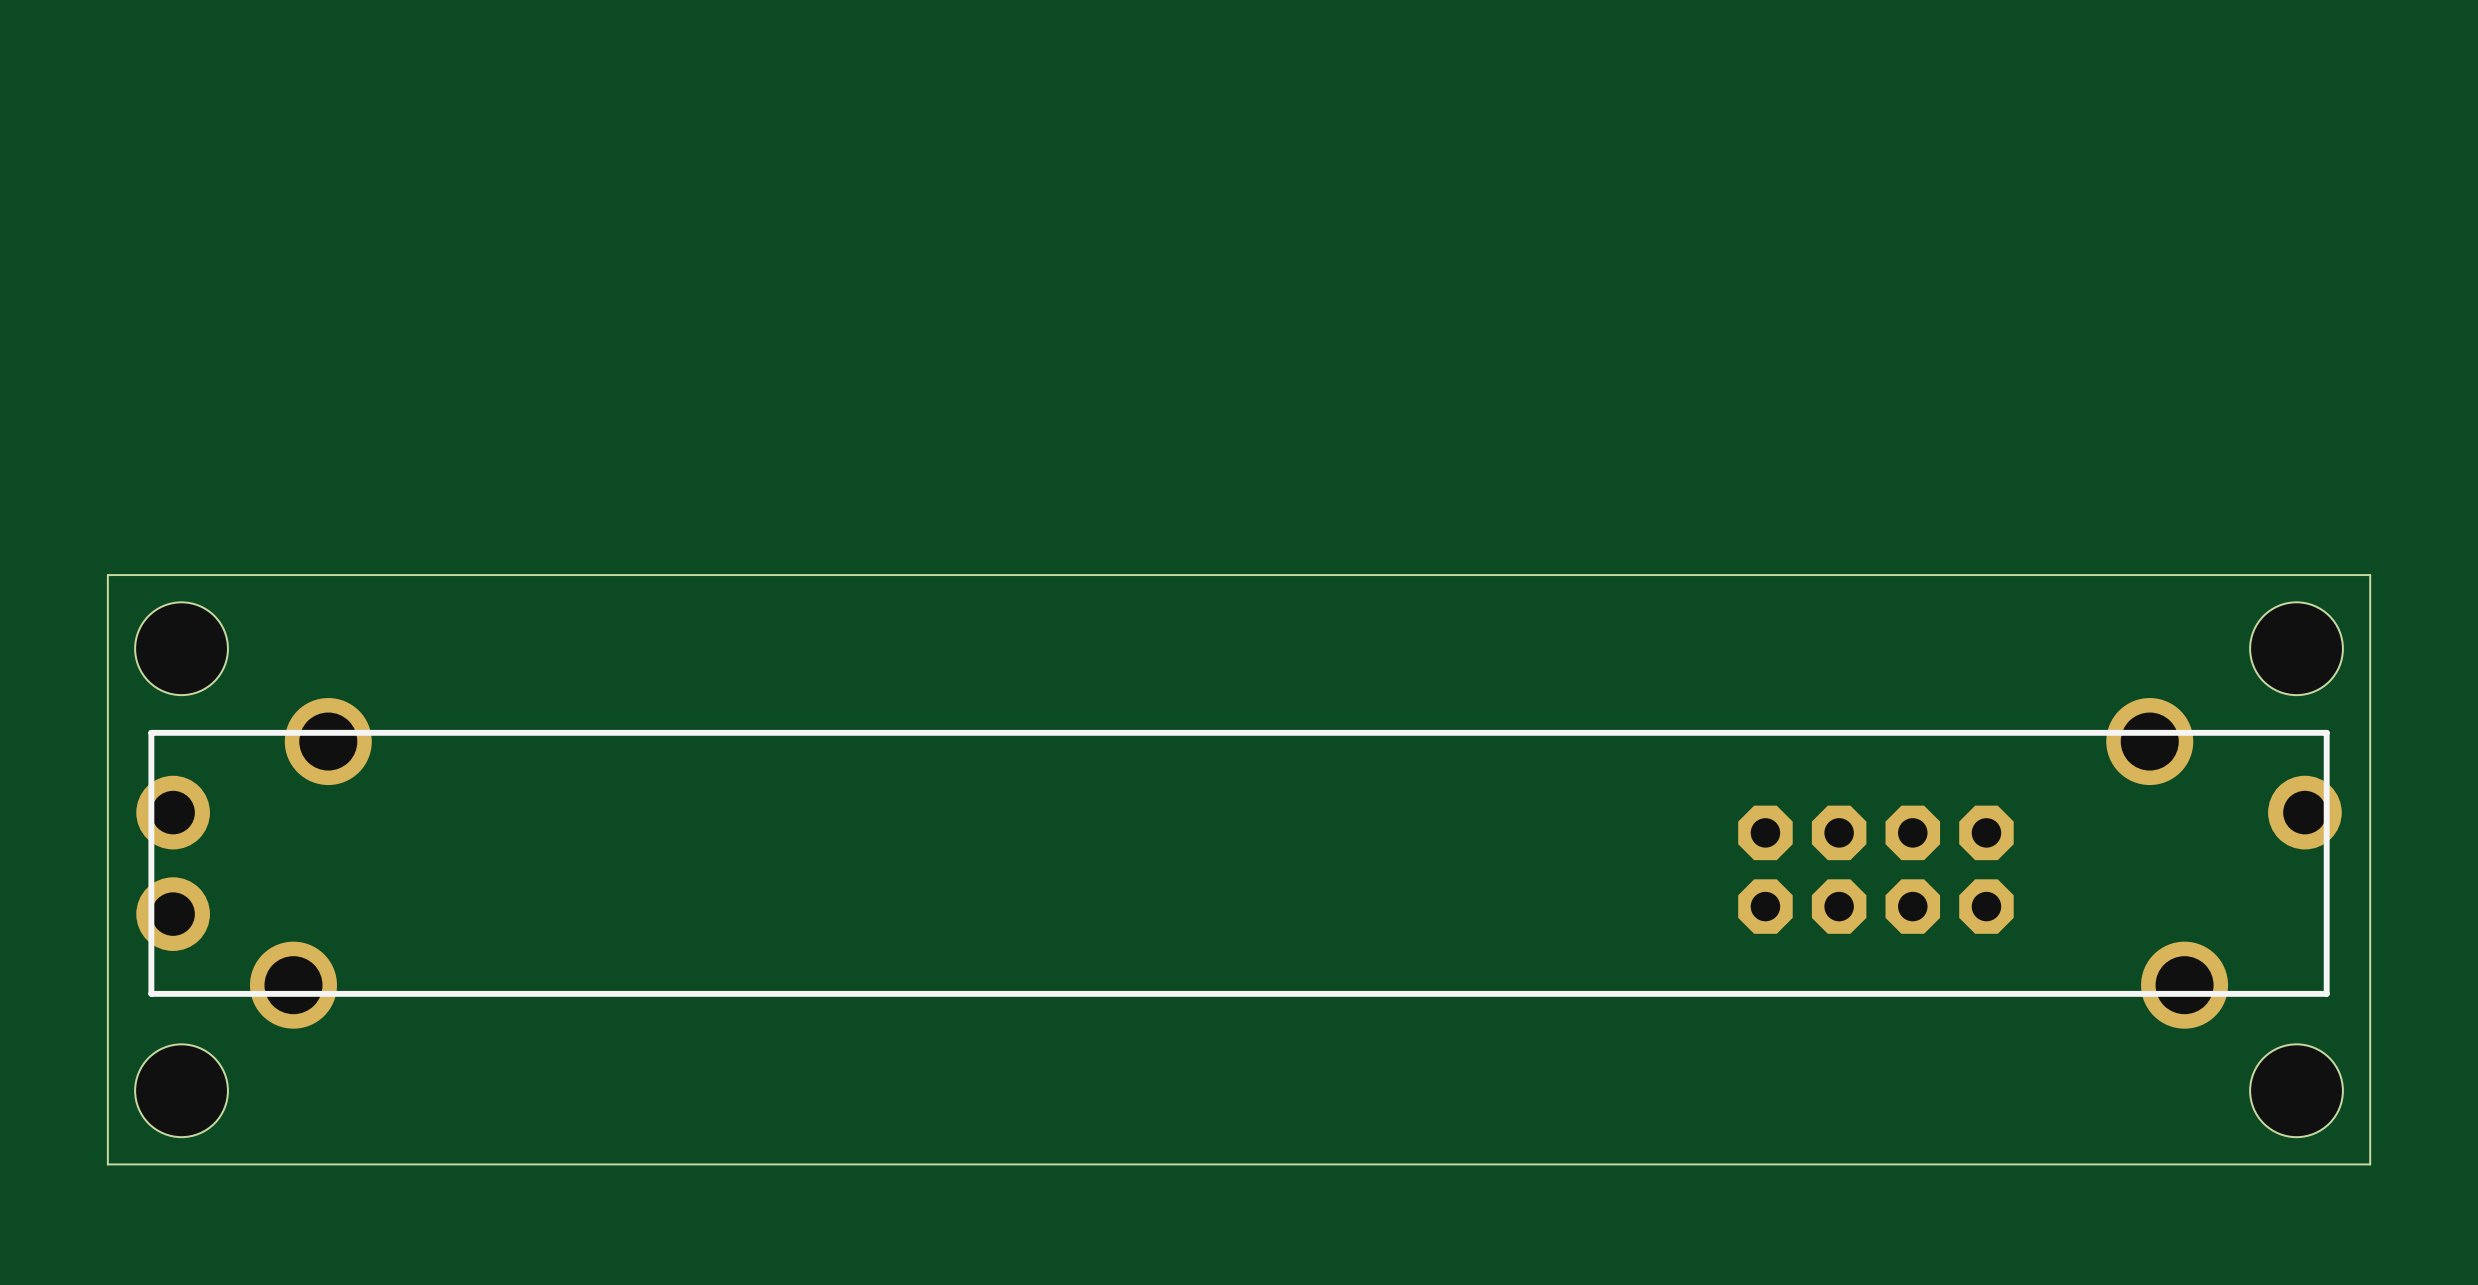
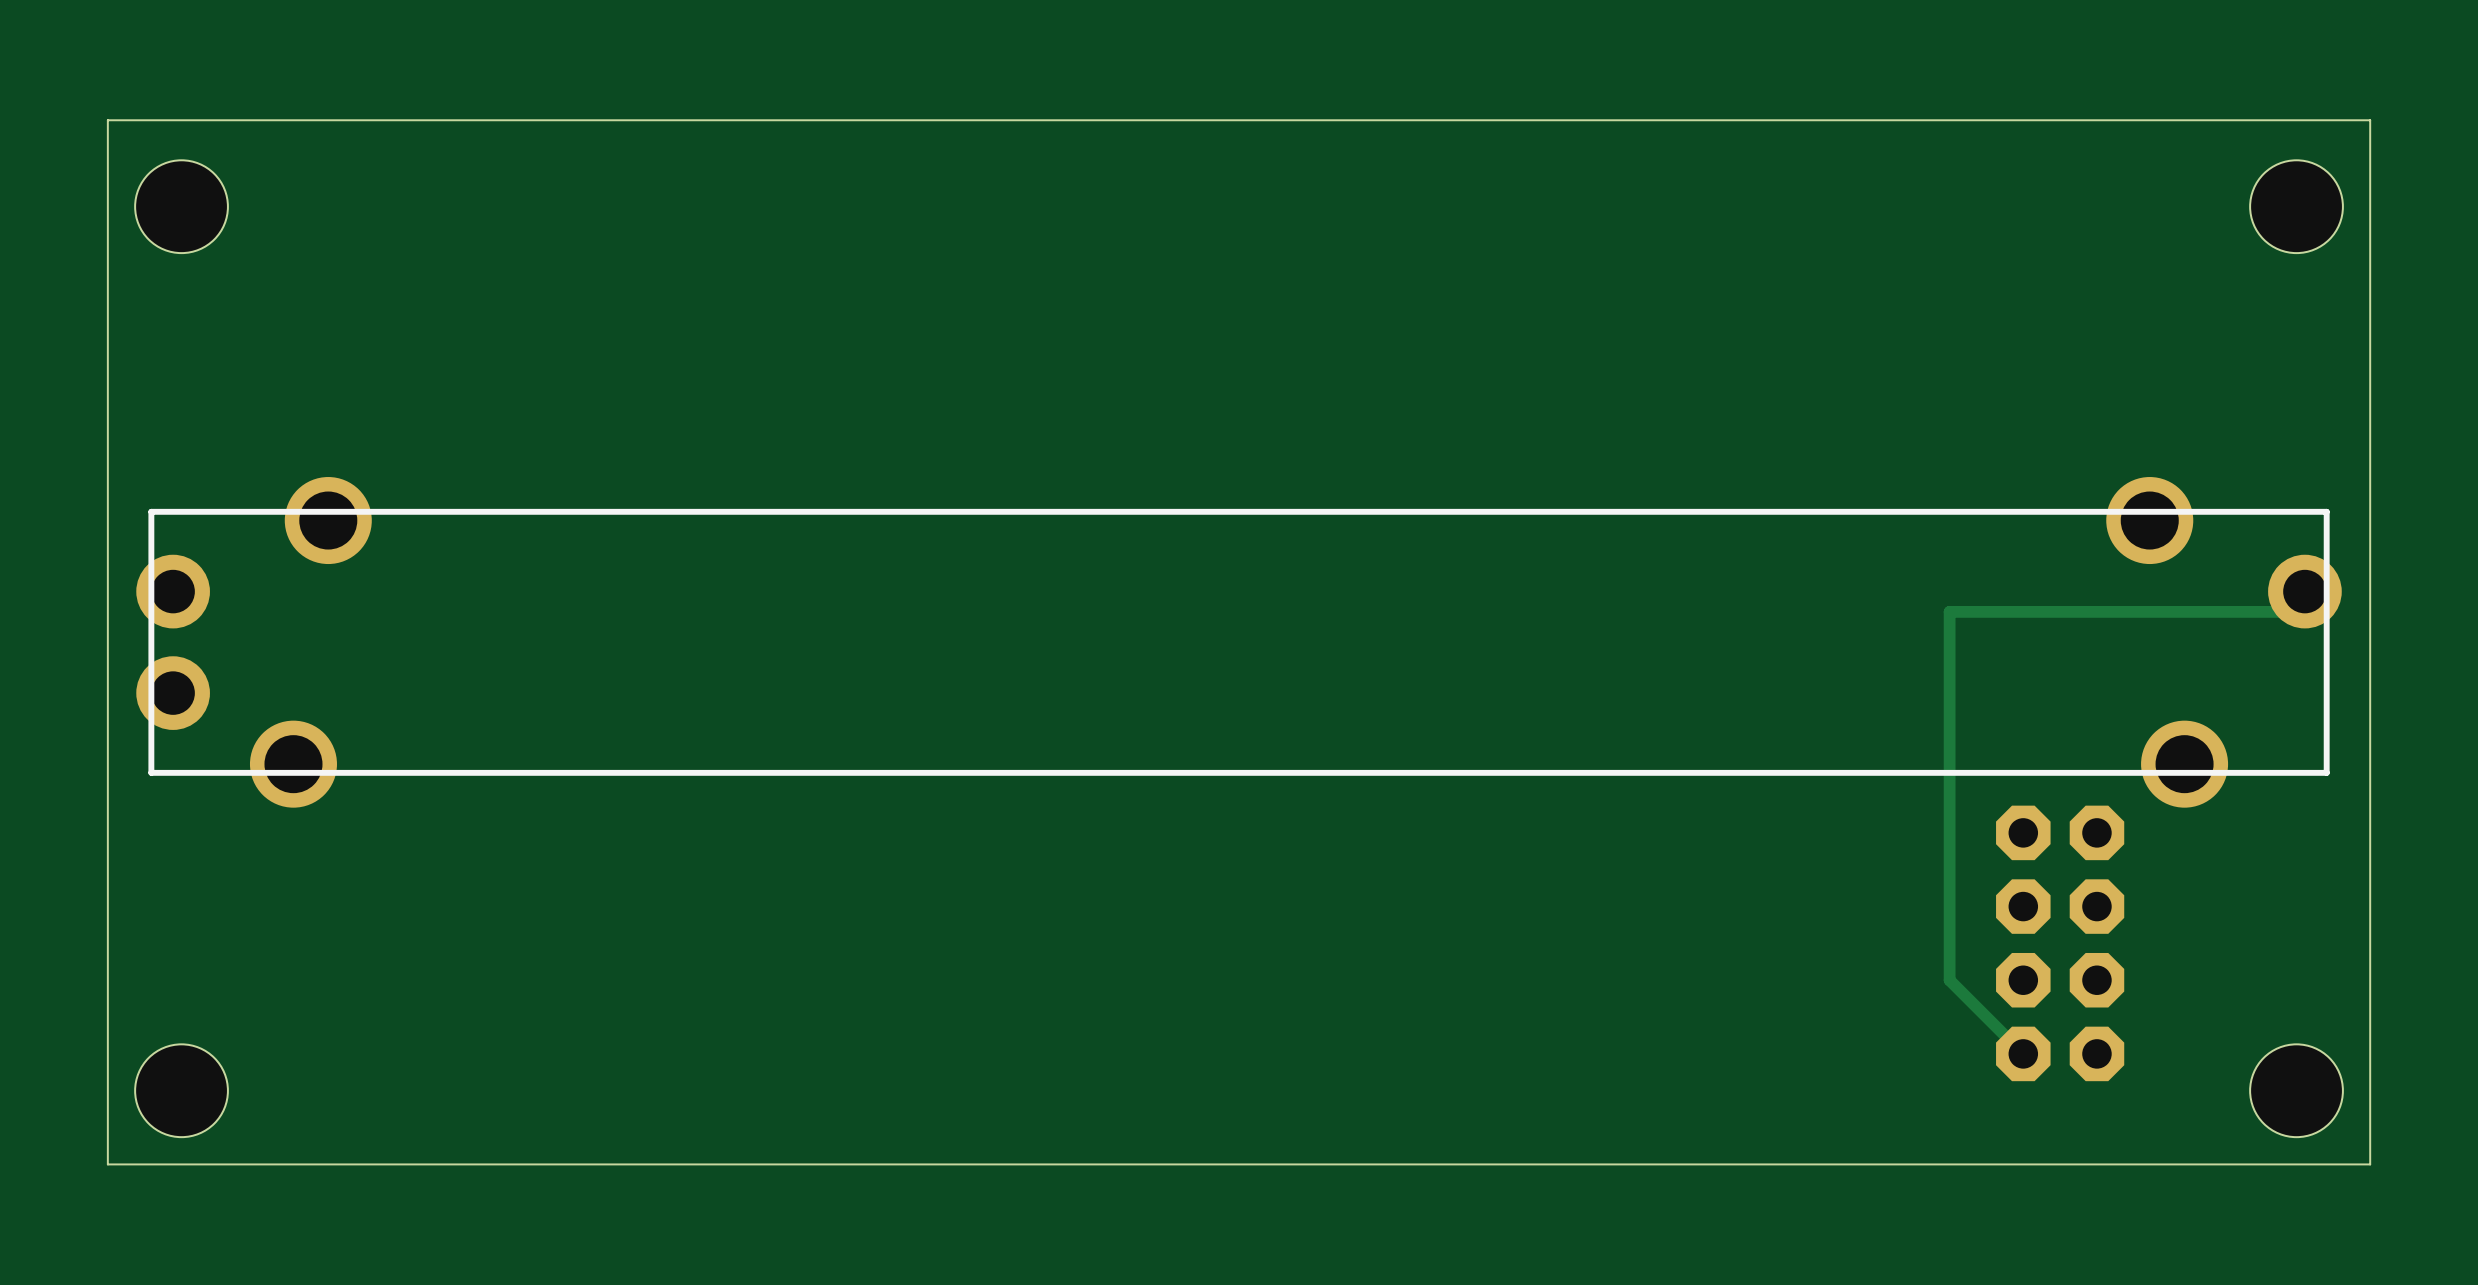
board edge: (107, 575) (2370, 575) -> (107, 575) (107, 120) (2370, 120) (2370, 575)
track: none -> (2304, 591) (2281, 611) (1949, 611) (1949, 980) (2023, 1053)
hole position: (181, 648) -> (181, 206)
hole position: (2296, 648) -> (2296, 206)
part position: (1239, 863) -> (1239, 642)
part rotation: 0° (1875, 869) -> 90° clockwise (2060, 943)
part position: (1875, 869) -> (2060, 943)

